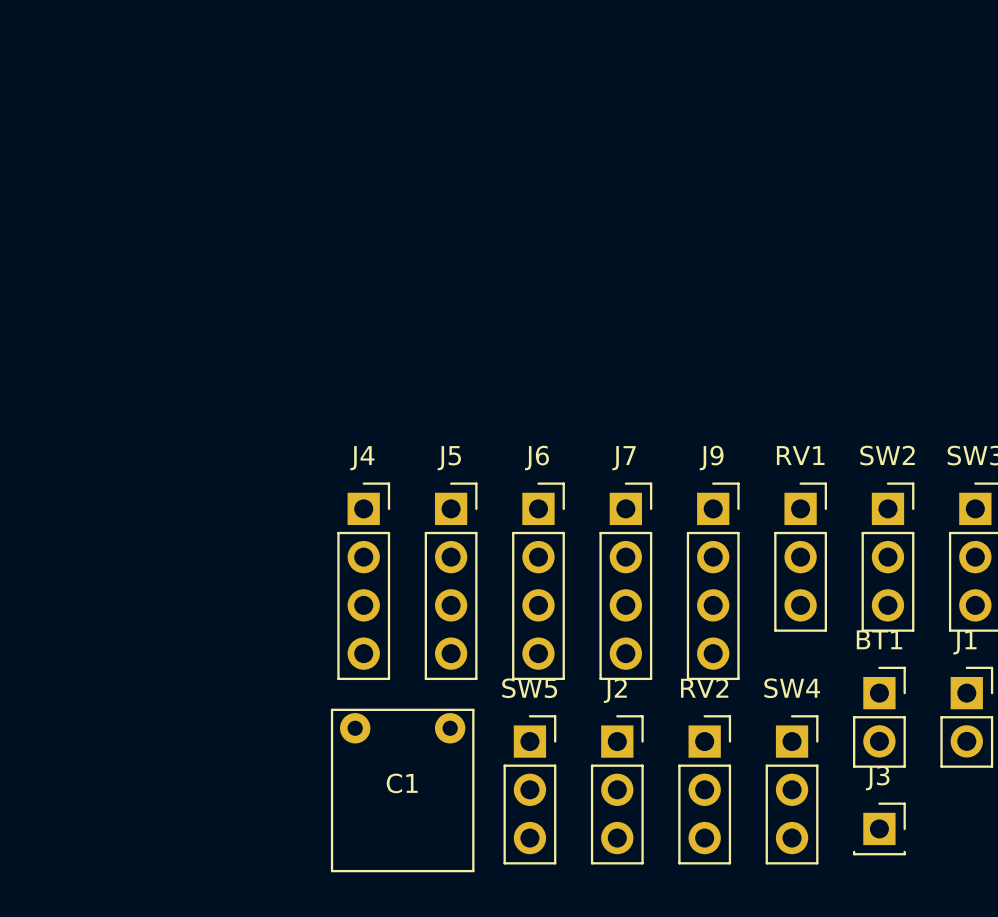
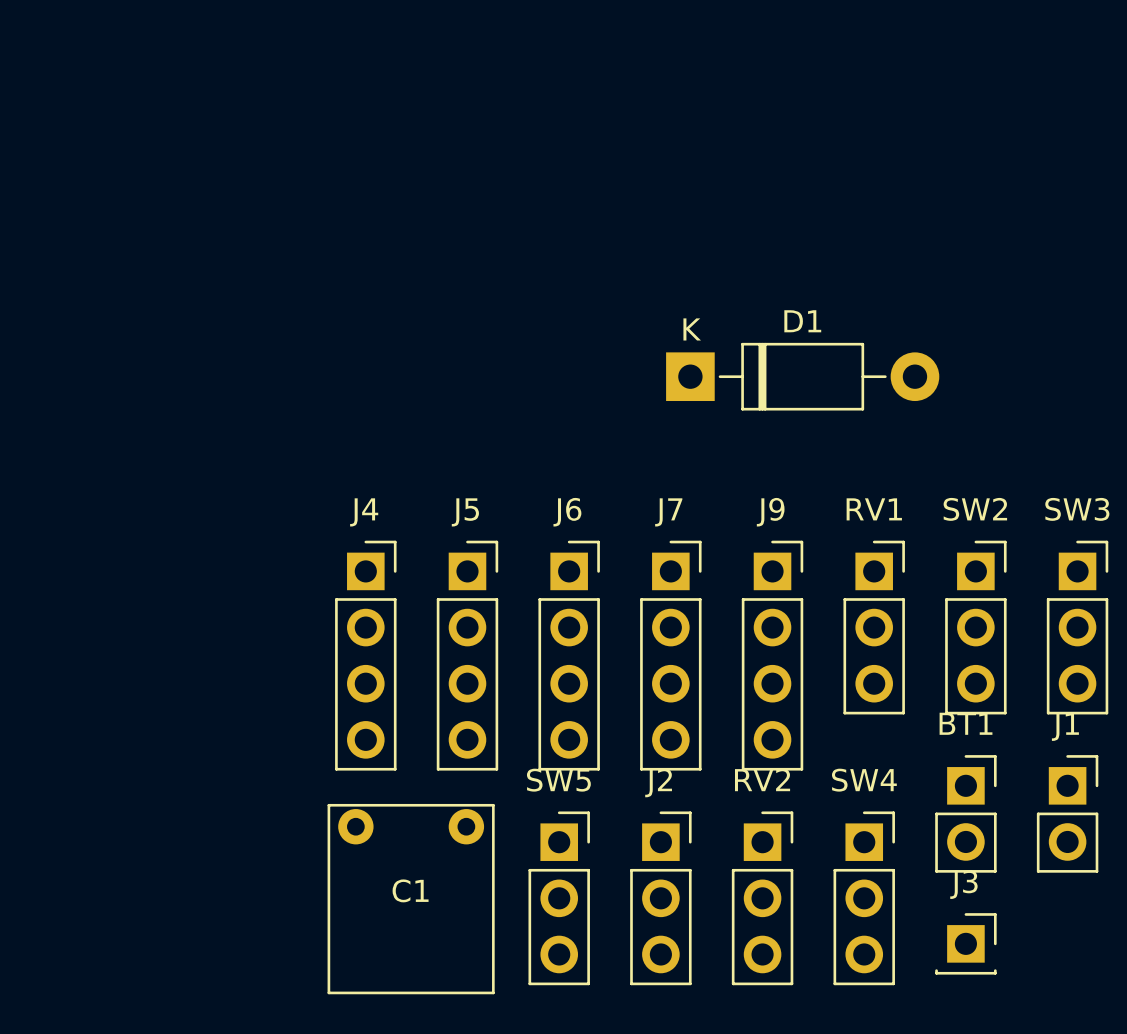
D1: none -> (802, 376)

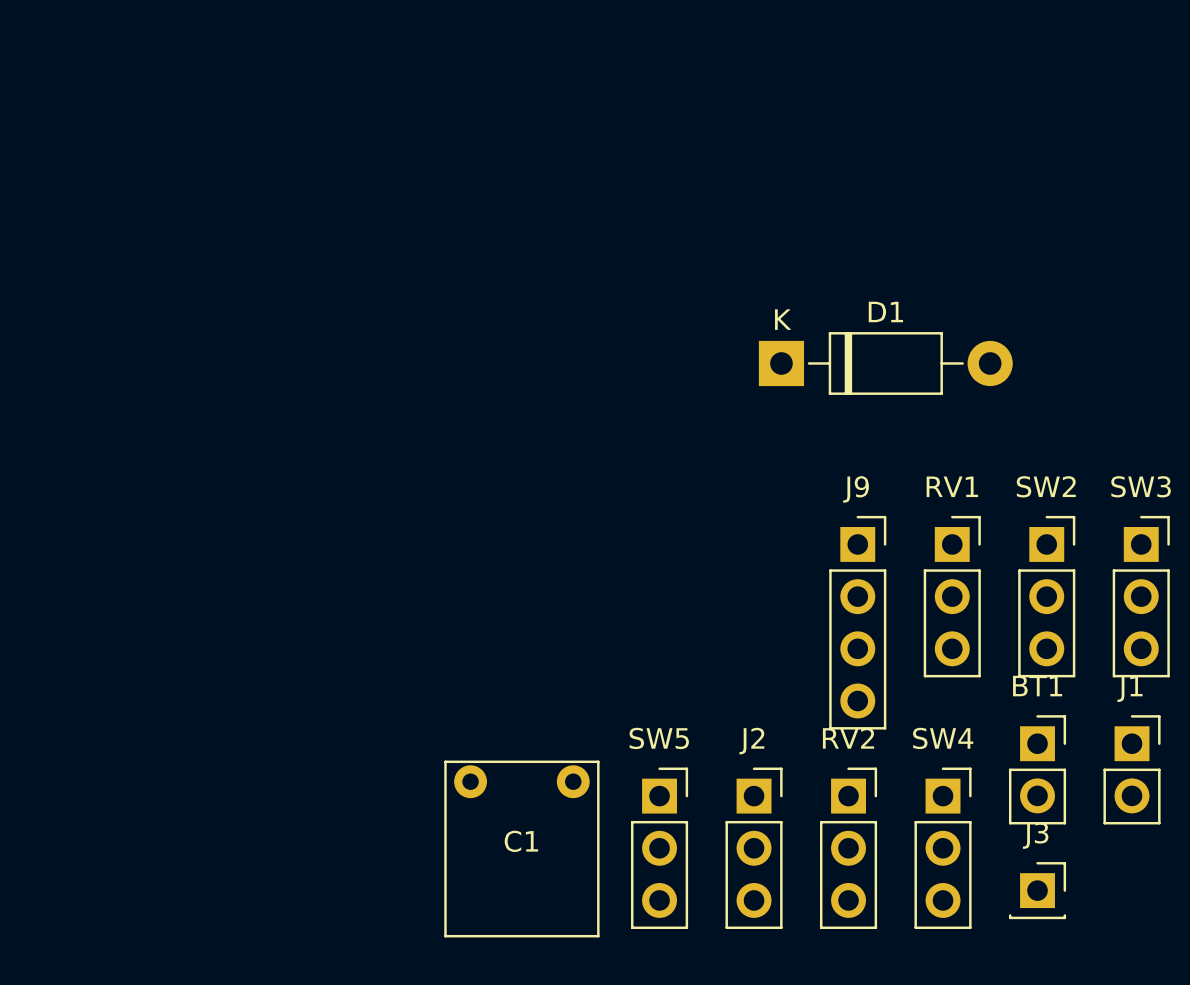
J4: (365, 655) -> none
J5: (467, 655) -> none
J6: (569, 655) -> none
J7: (670, 655) -> none

